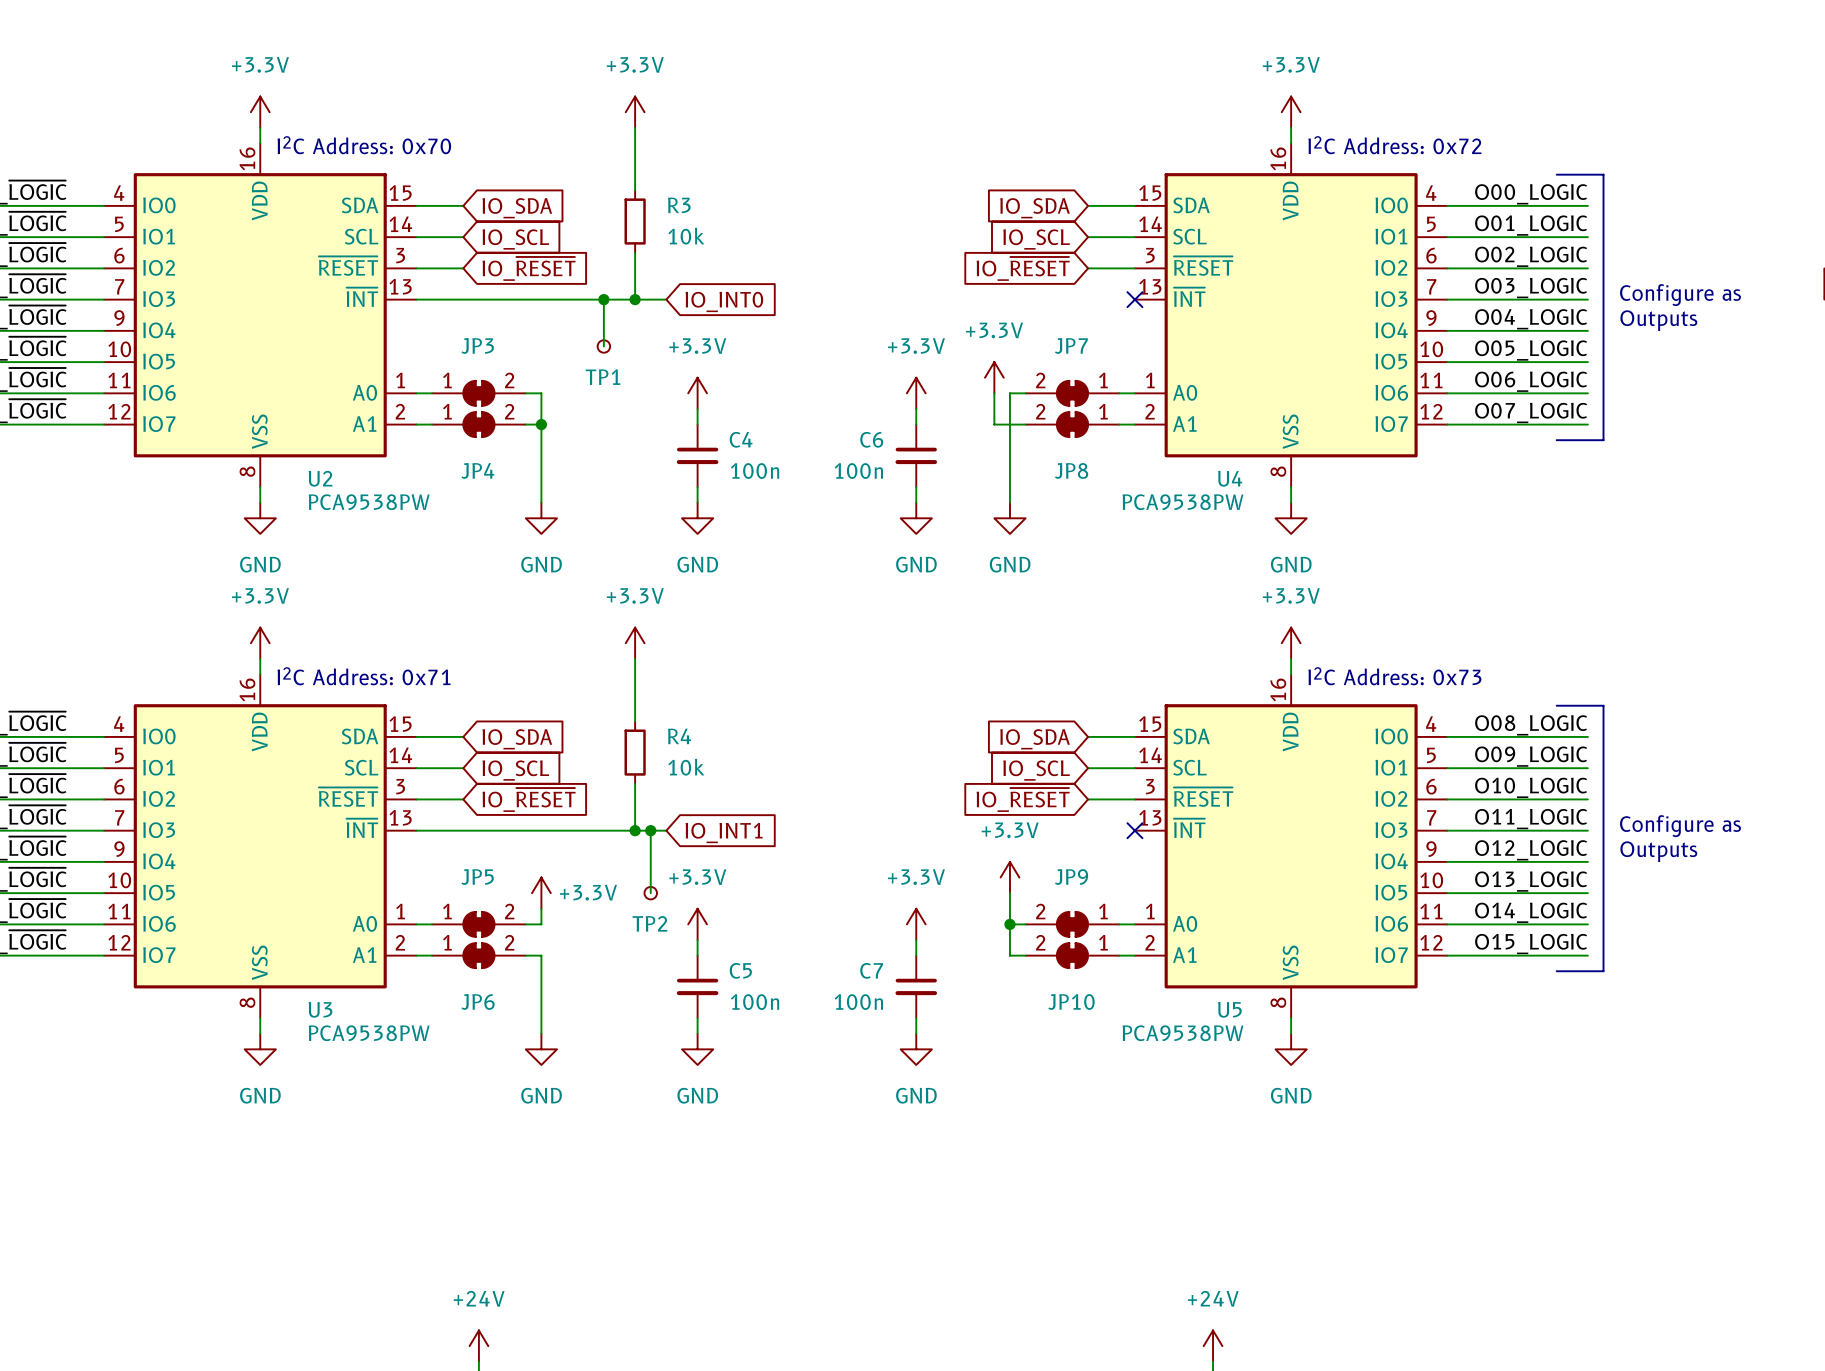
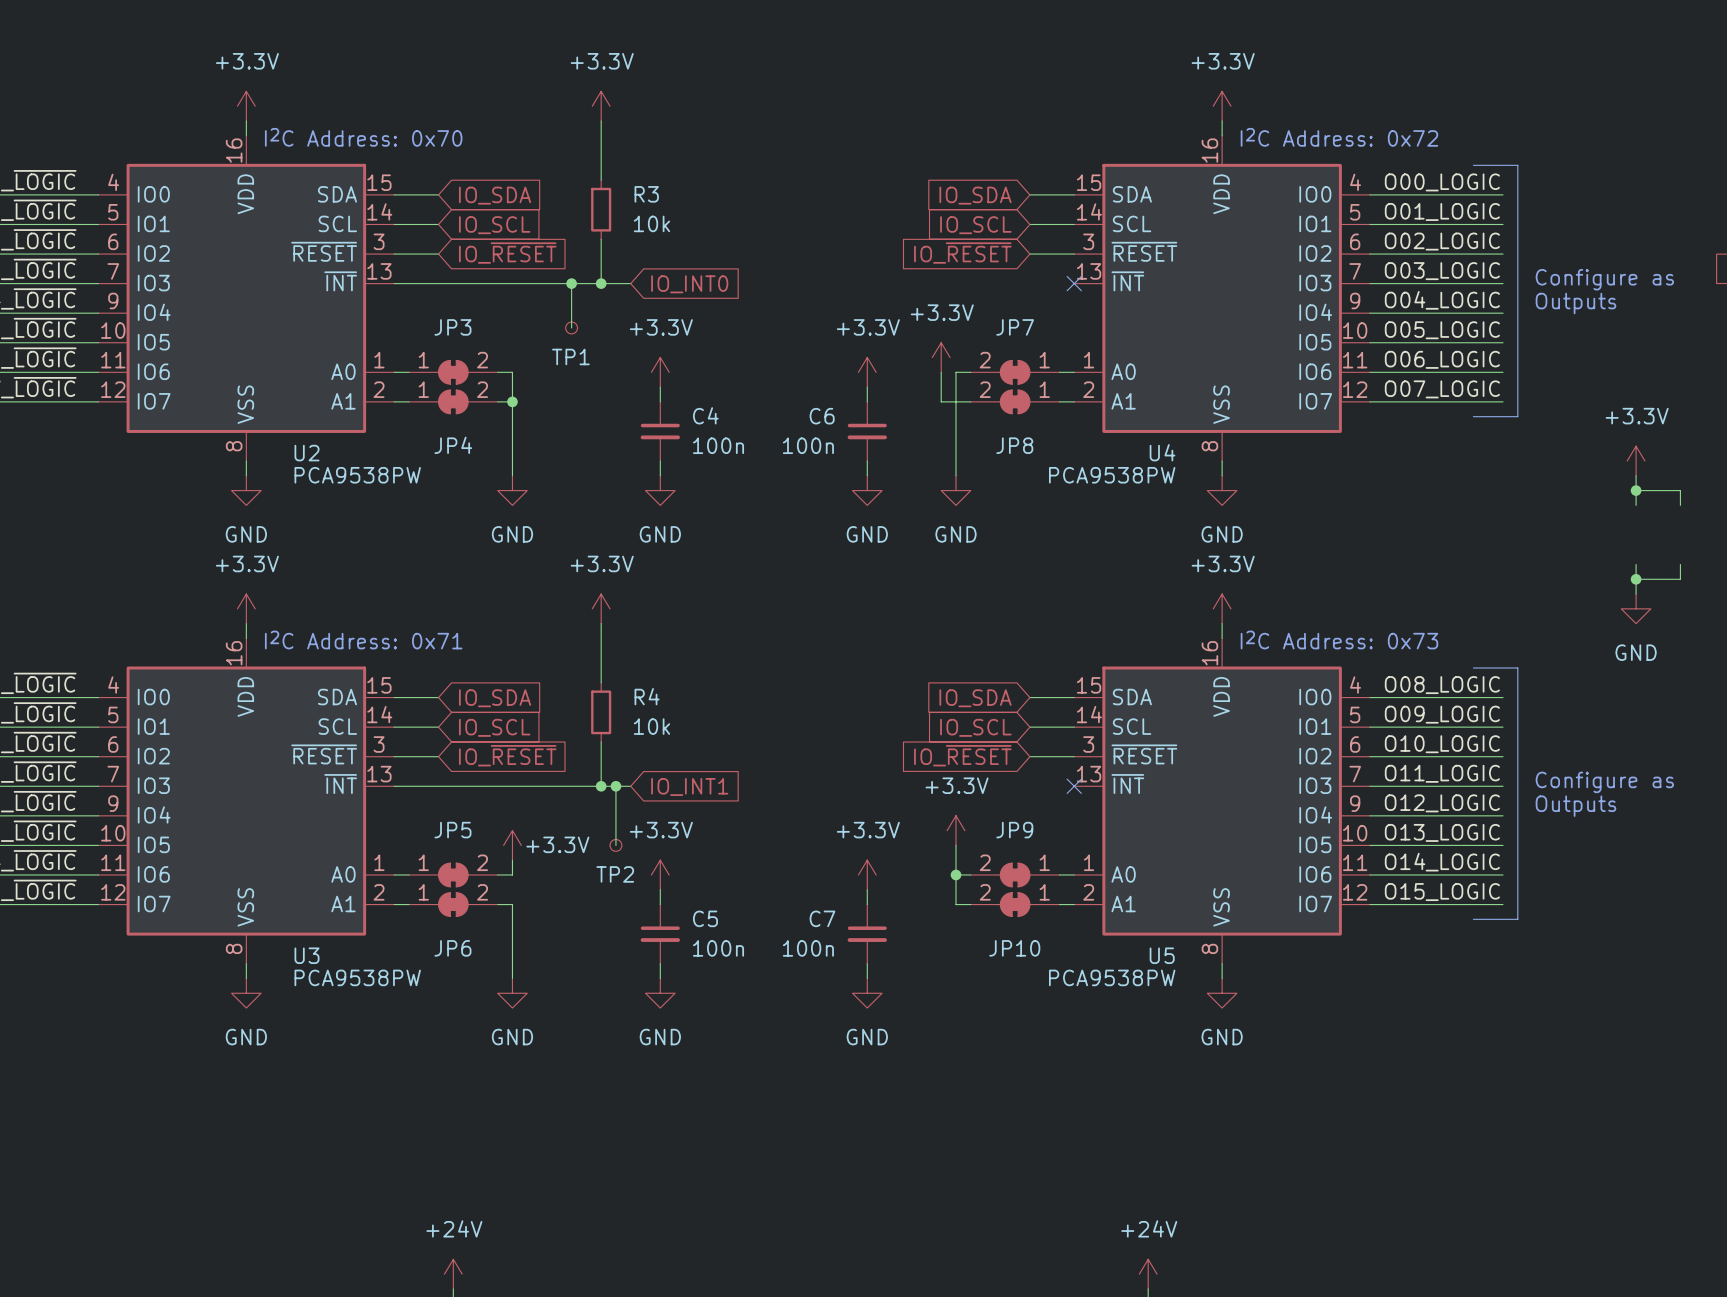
power symbol: none -> +3.3V (1636, 461)
wire: none -> (1636, 475) (1636, 505)
wire: none -> (1636, 490) (1680, 490) (1680, 505)
junction: none -> (1636, 490)
wire: none -> (1636, 564) (1636, 594)
wire: none -> (1680, 564) (1680, 579) (1636, 579)
junction: none -> (1636, 579)
power symbol: none -> GND (1636, 608)

